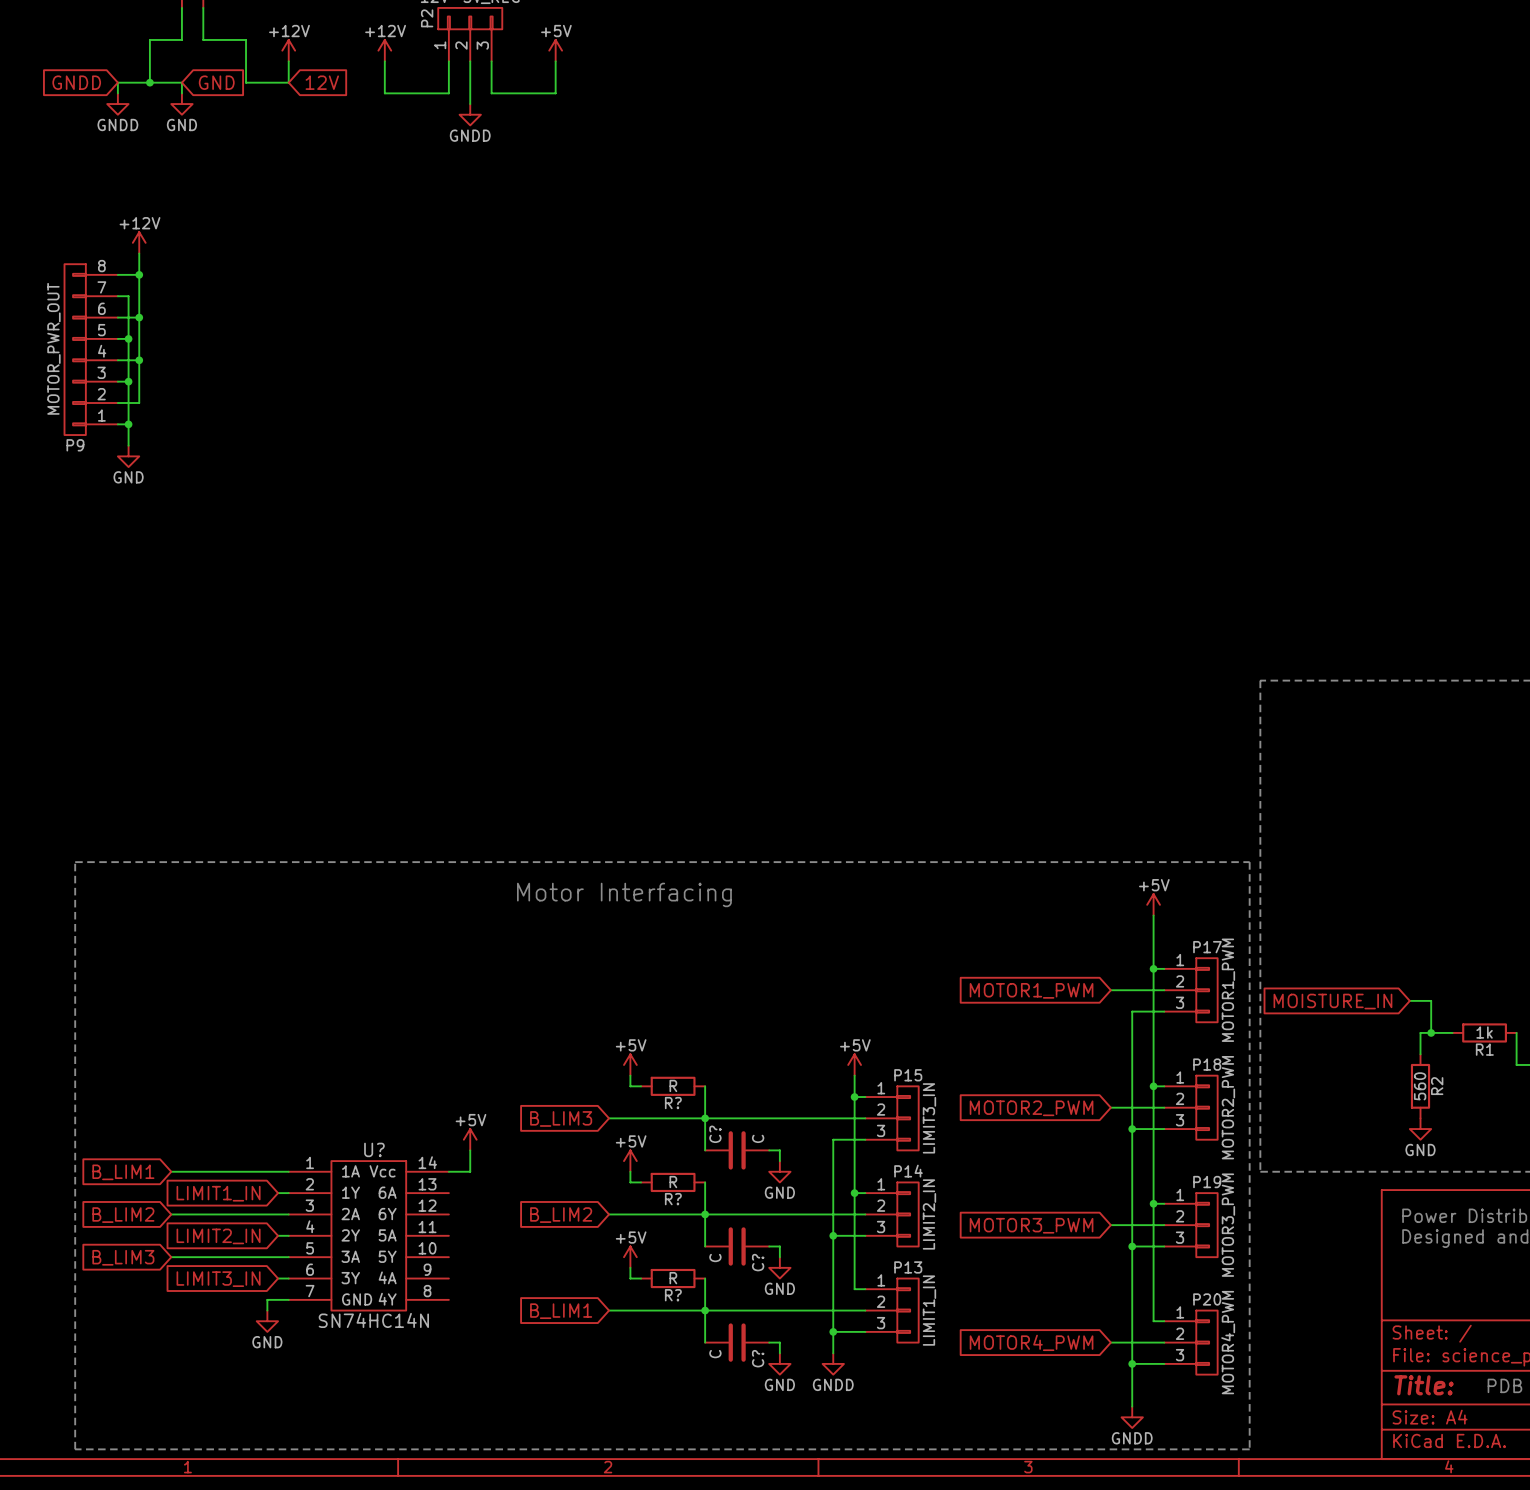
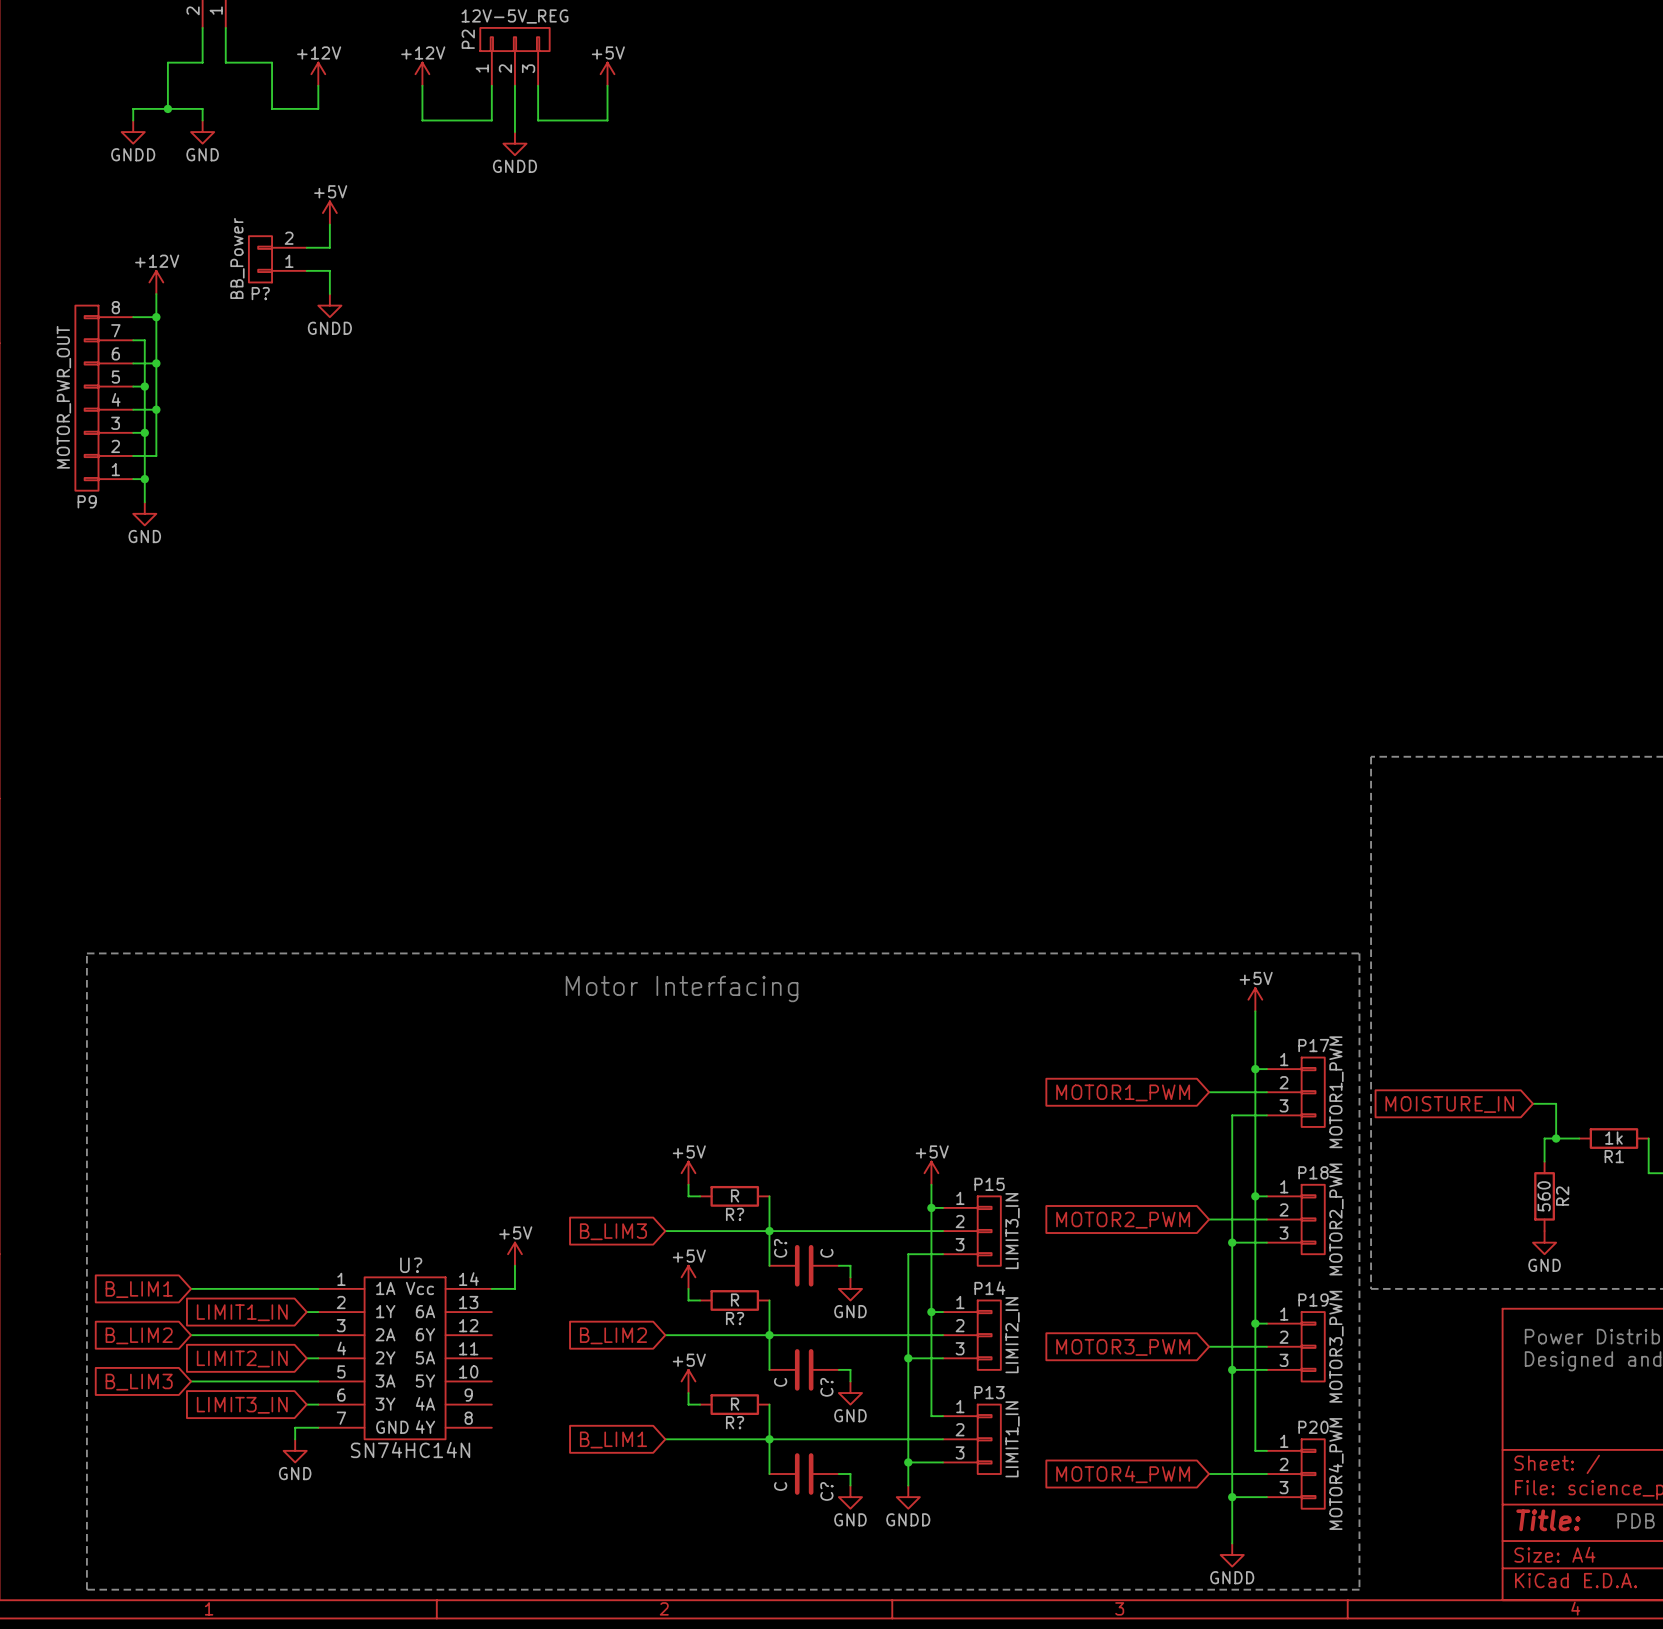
global label: GNDD (76, 82) -> none
global label: GND (216, 82) -> none
global label: 12V (322, 82) -> none
power symbol: none -> +5V (329, 213)
wire: none -> (329, 224) (329, 247) (306, 247)
P?: none -> BB_Power (277, 259)
wire: none -> (306, 270) (329, 270) (329, 294)
power symbol: none -> GNDD (329, 305)

